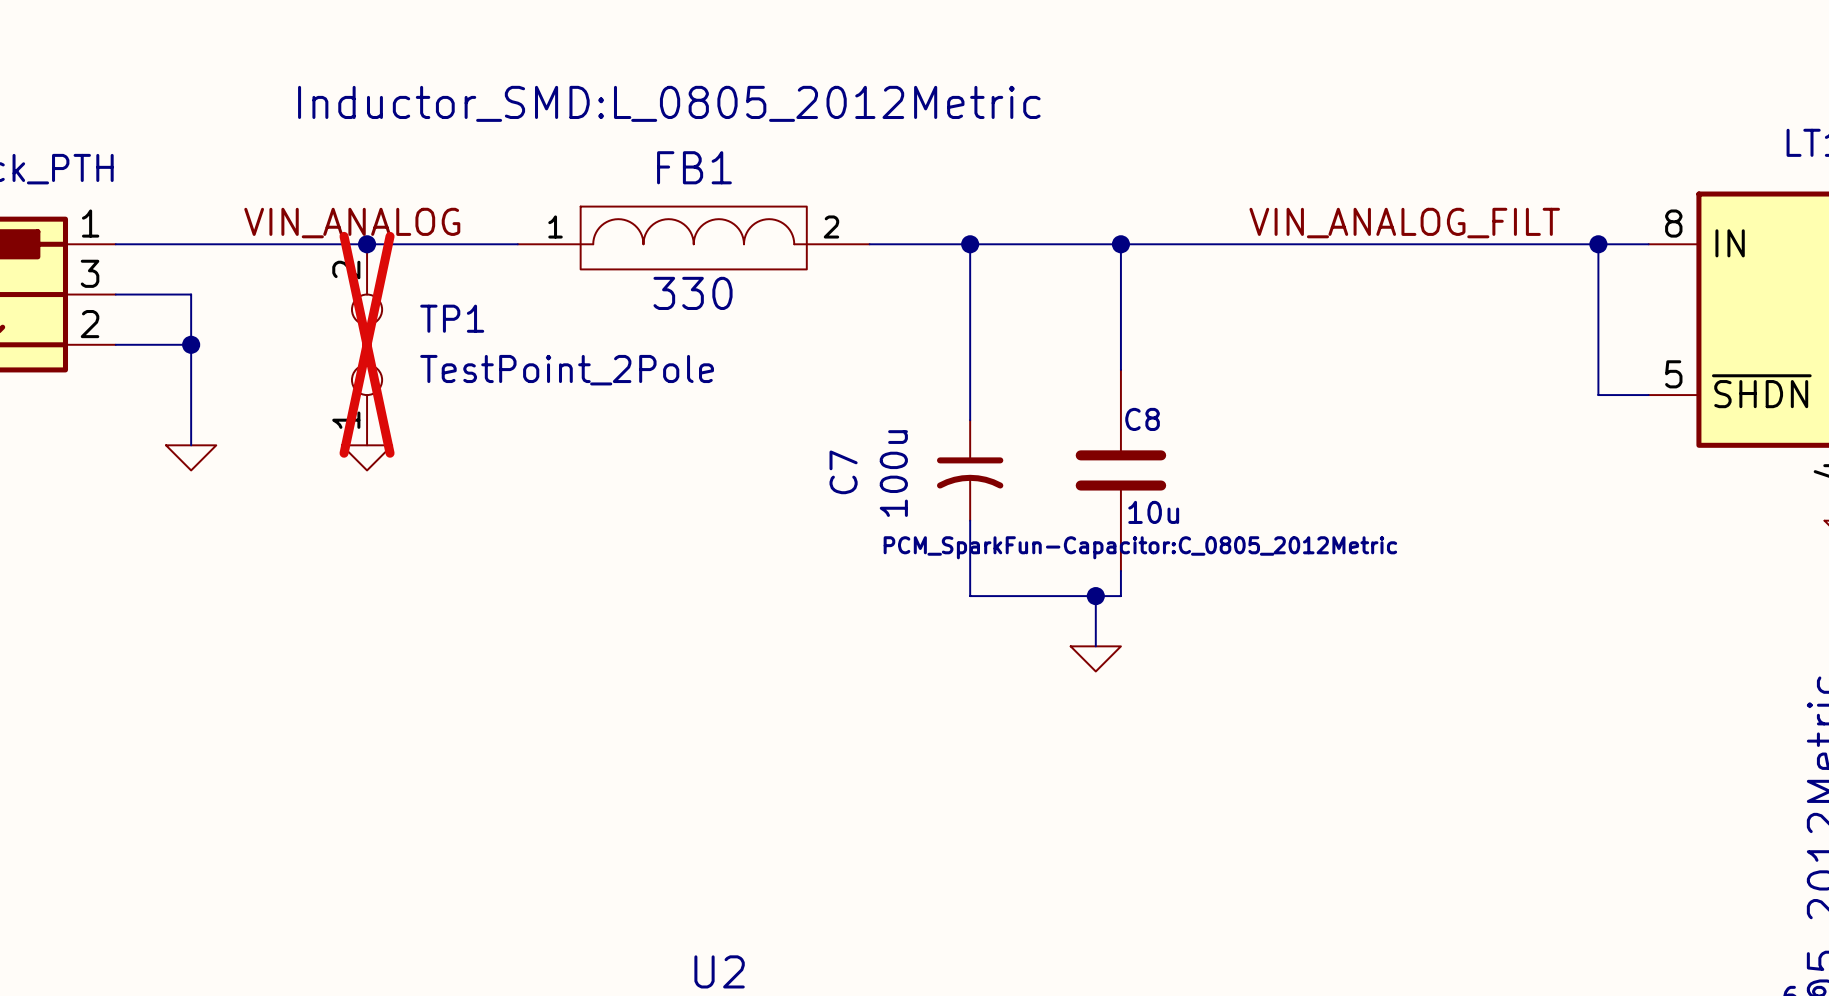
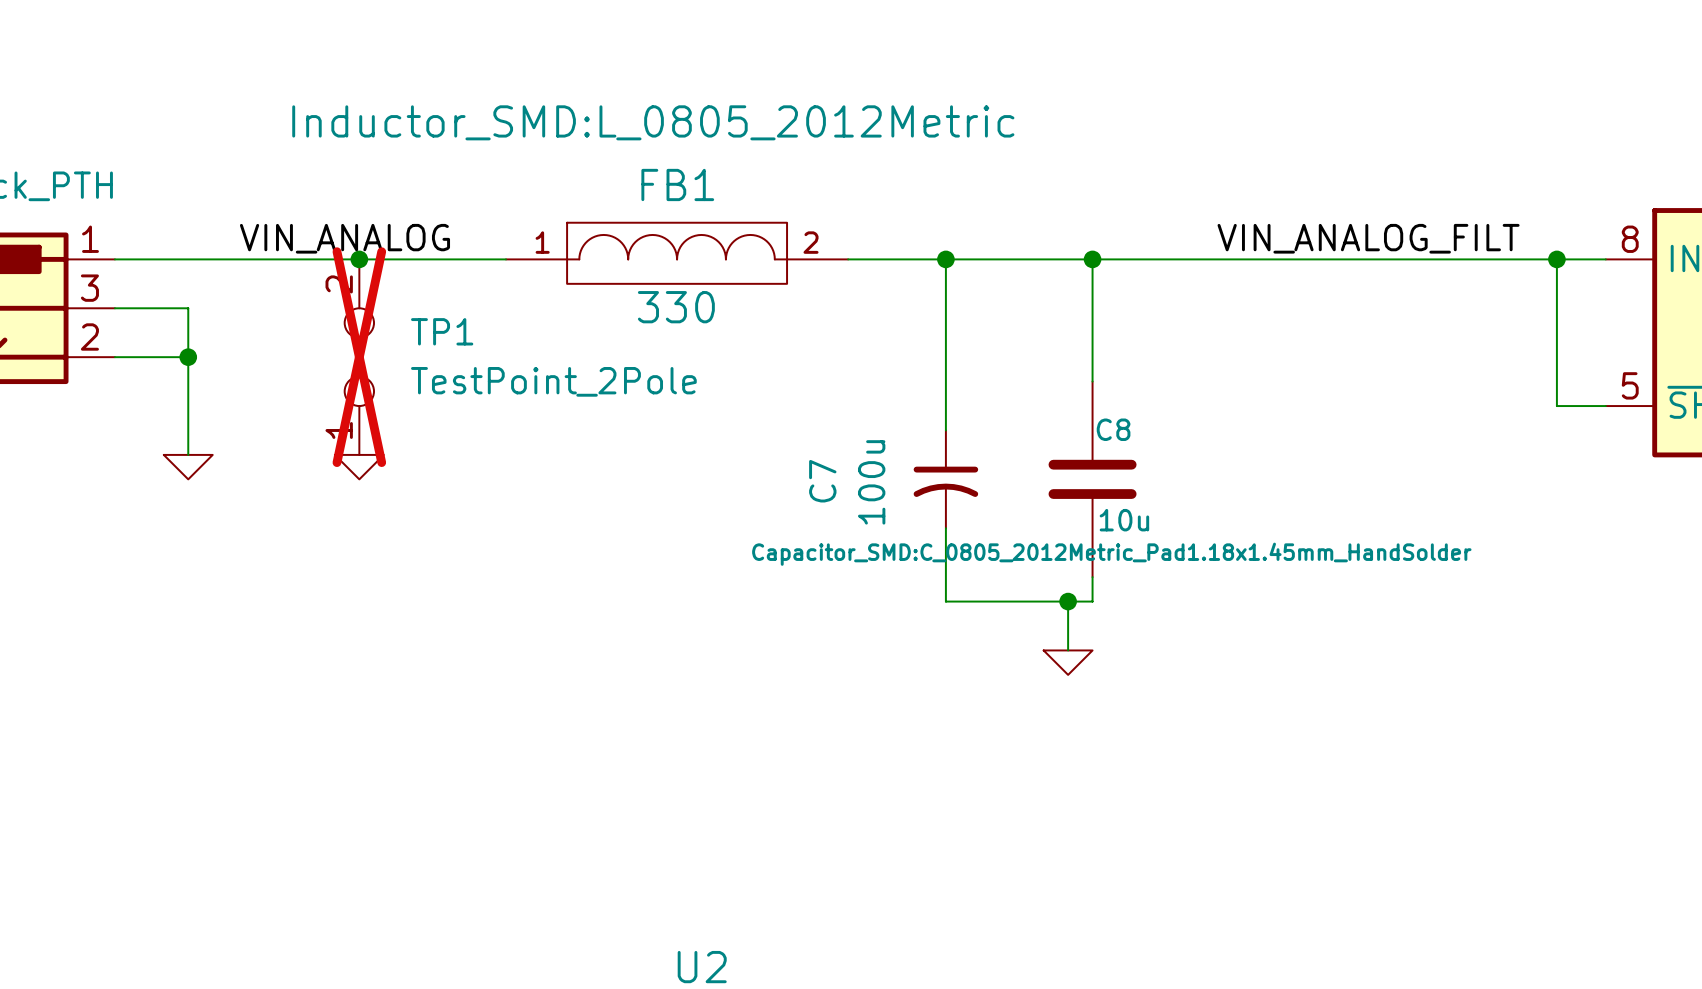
C8 text: PCM_SparkFun-Capacitor:C_0805_2012Metric (1140, 547) -> Capacitor_SMD:C_0805_2012Metric_Pad1.18x1.45mm_HandSolder (1111, 554)

